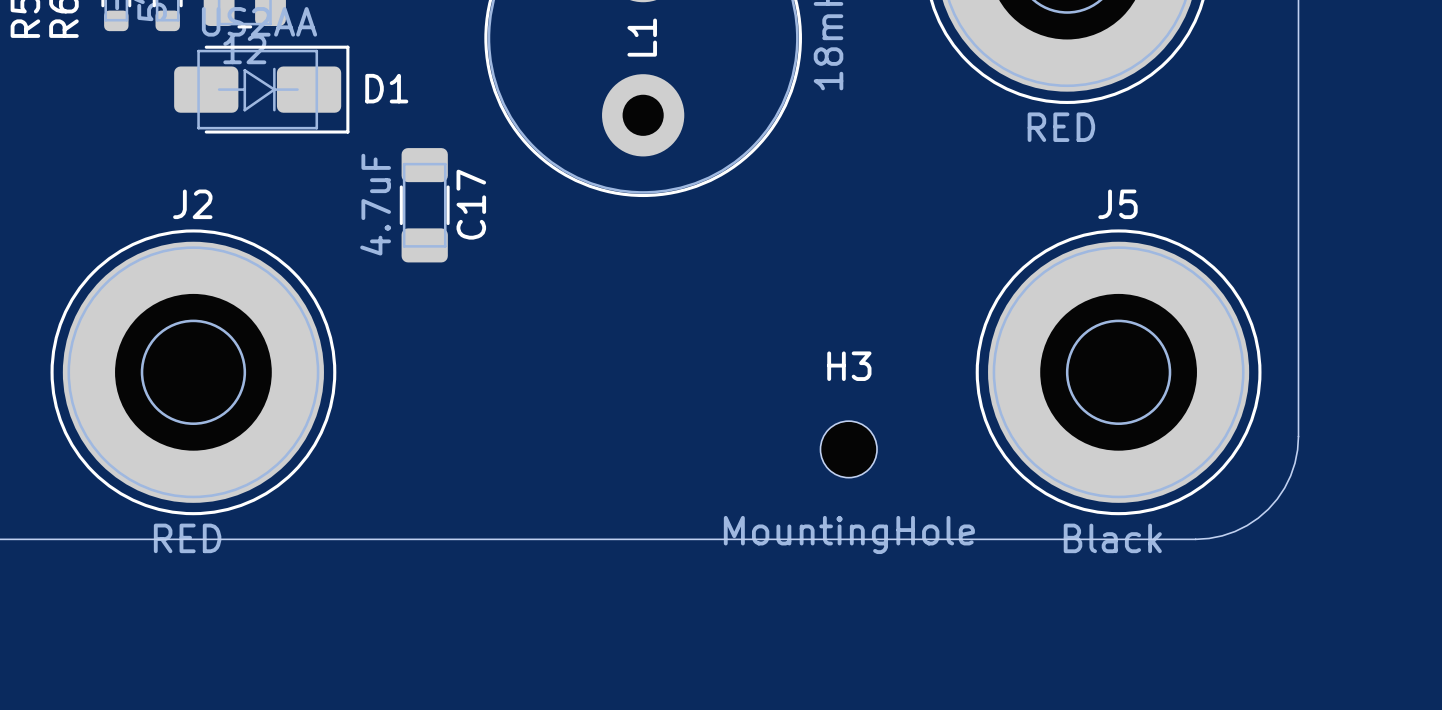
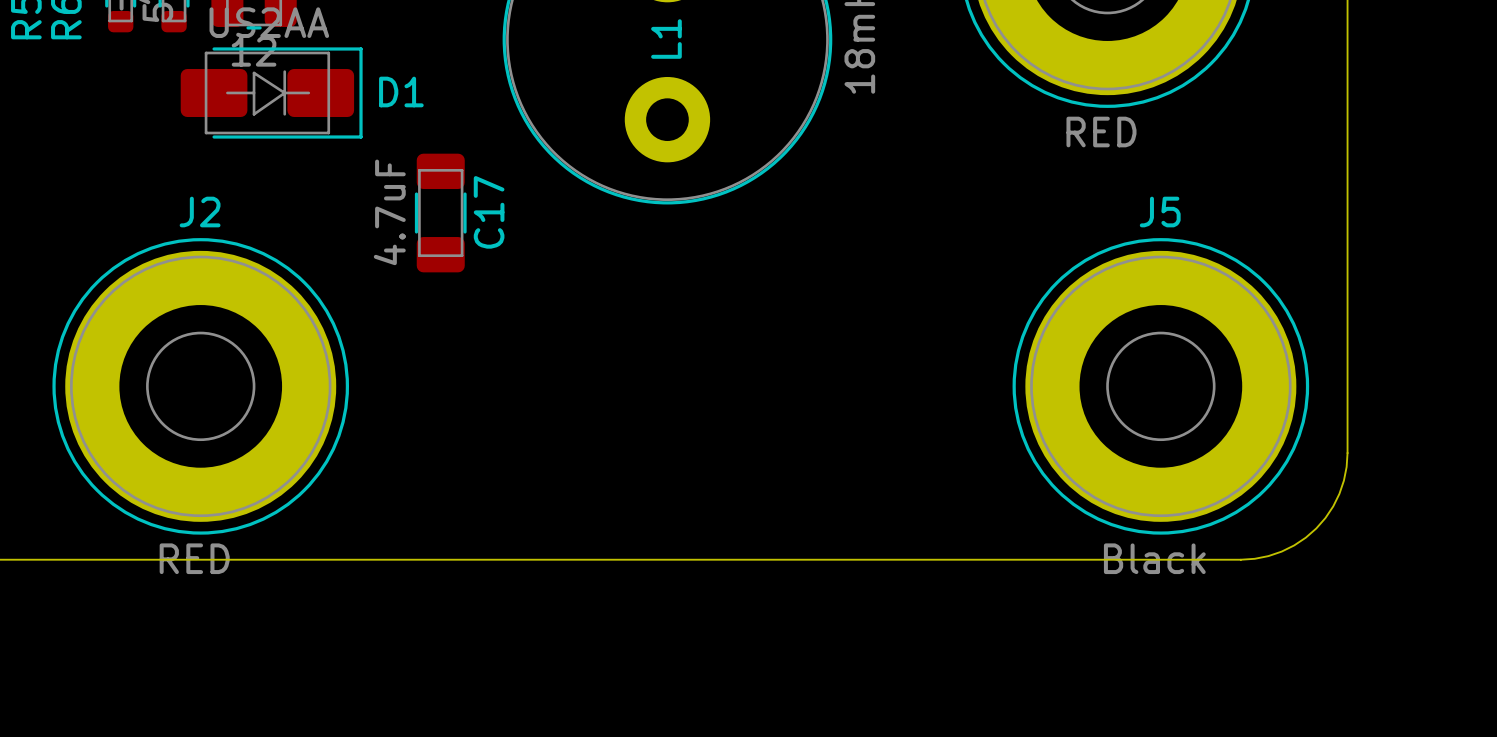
H3: MountingHole (848, 449) -> none

